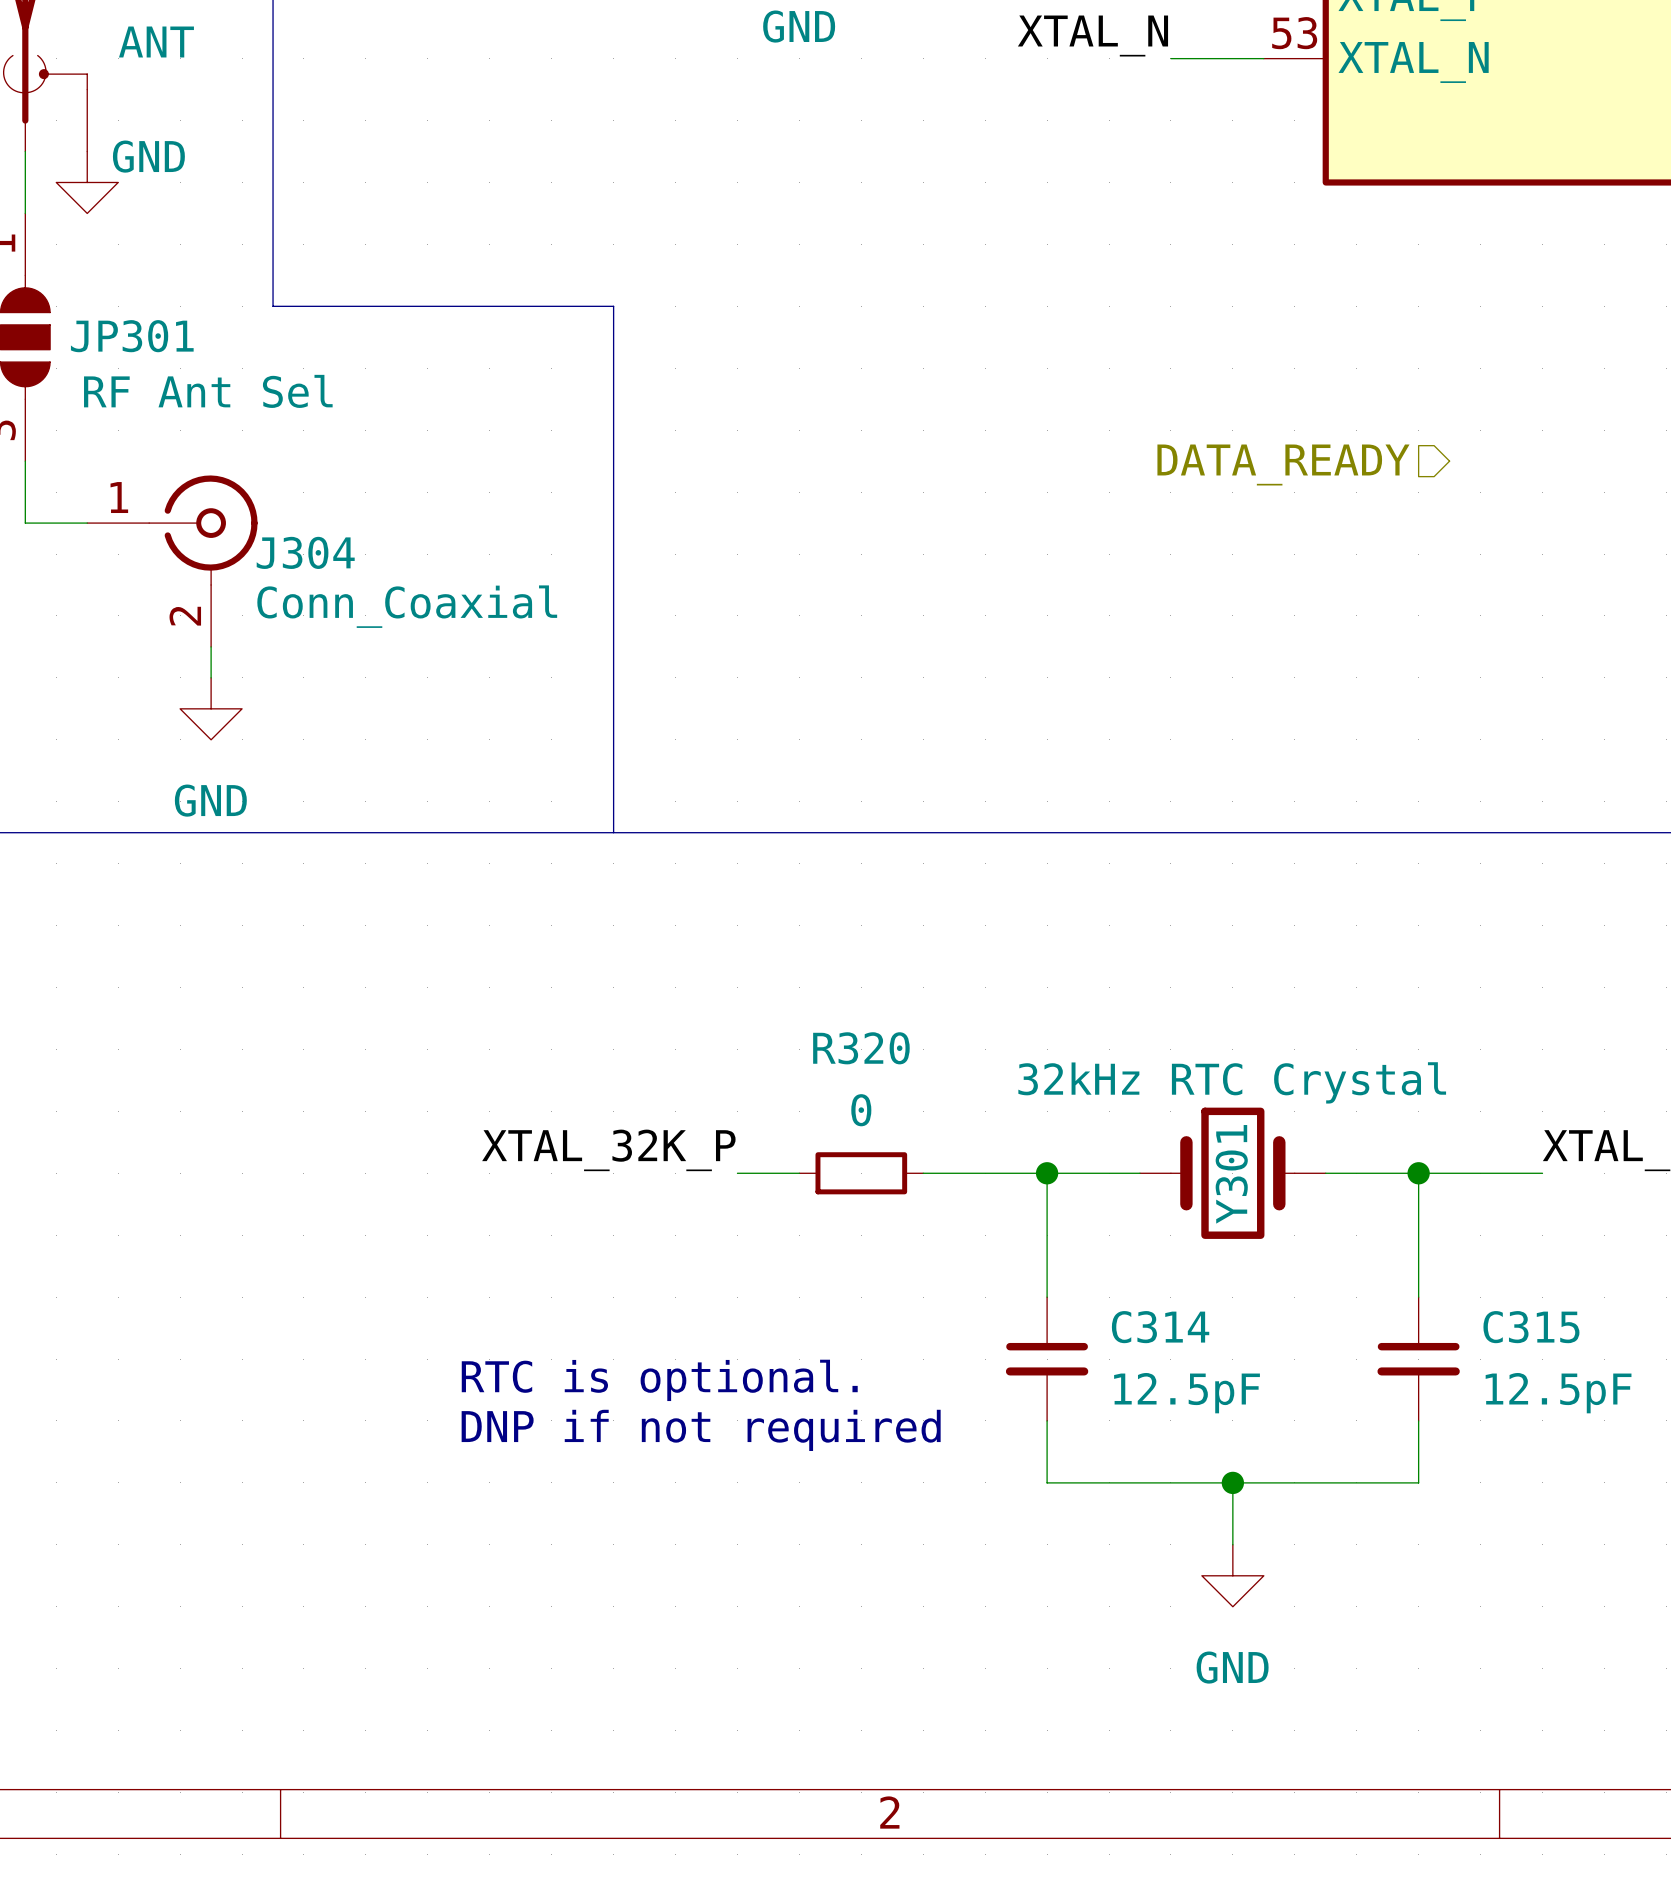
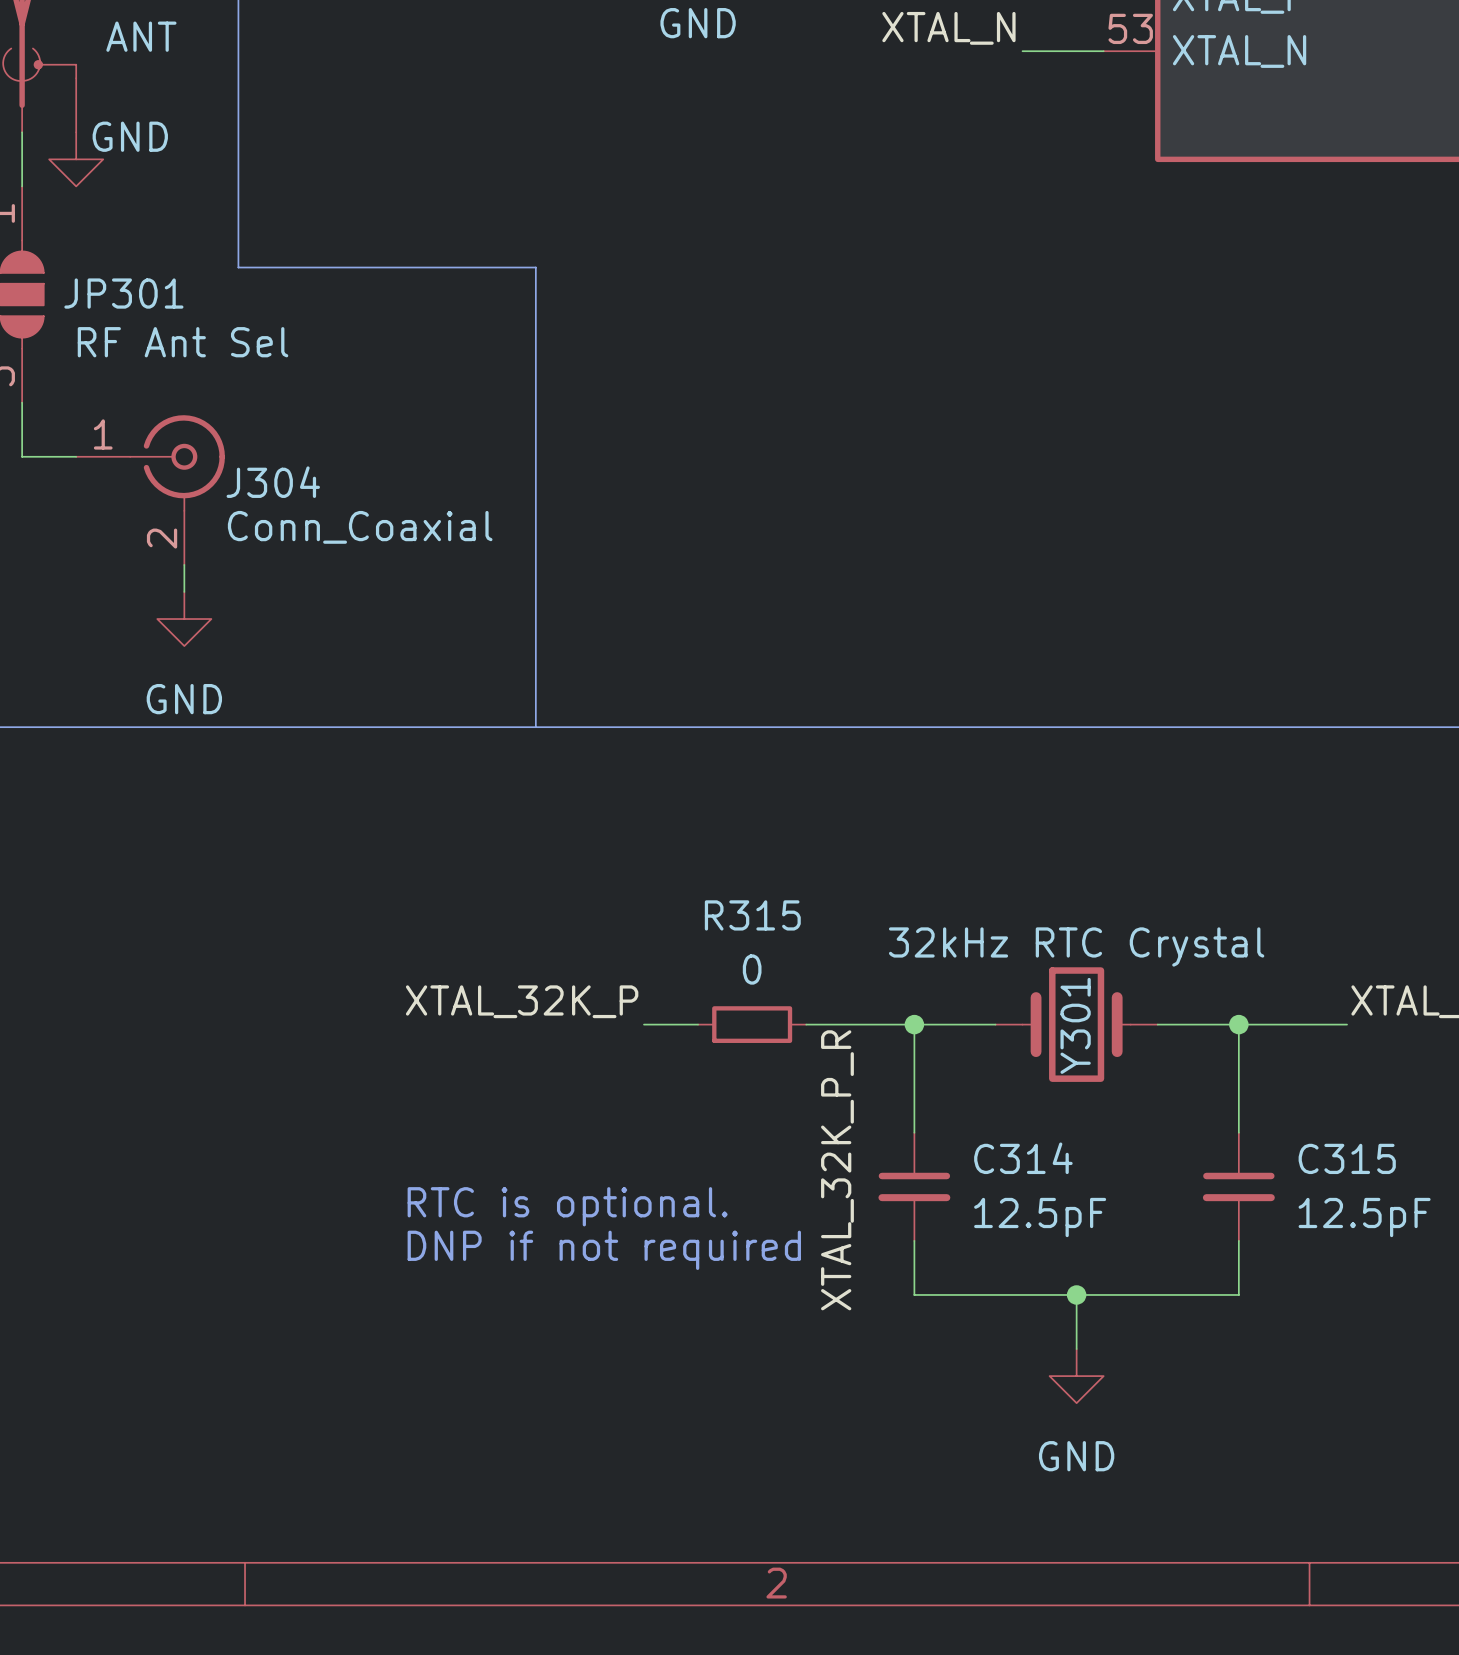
hierarchical label: DATA_READY (1283, 464) -> none
R320 name: R320 (861, 1048) -> R315 (752, 915)
label: none -> XTAL_32K_P_R (837, 1170)

